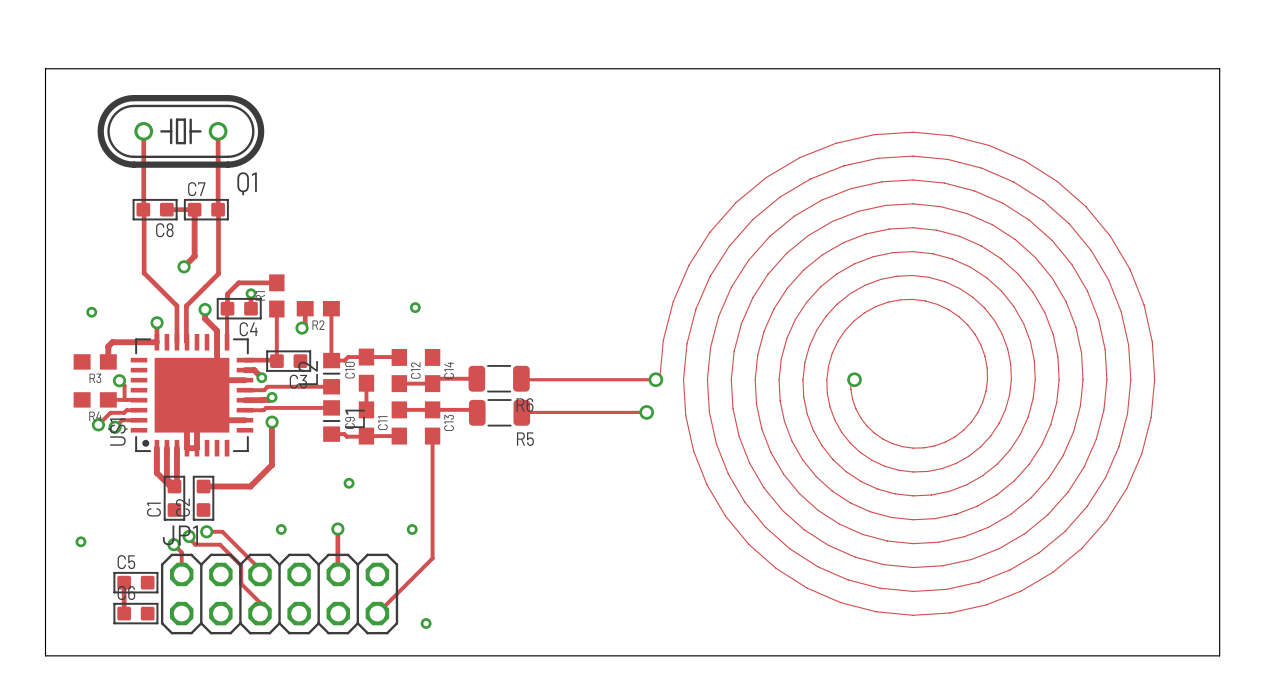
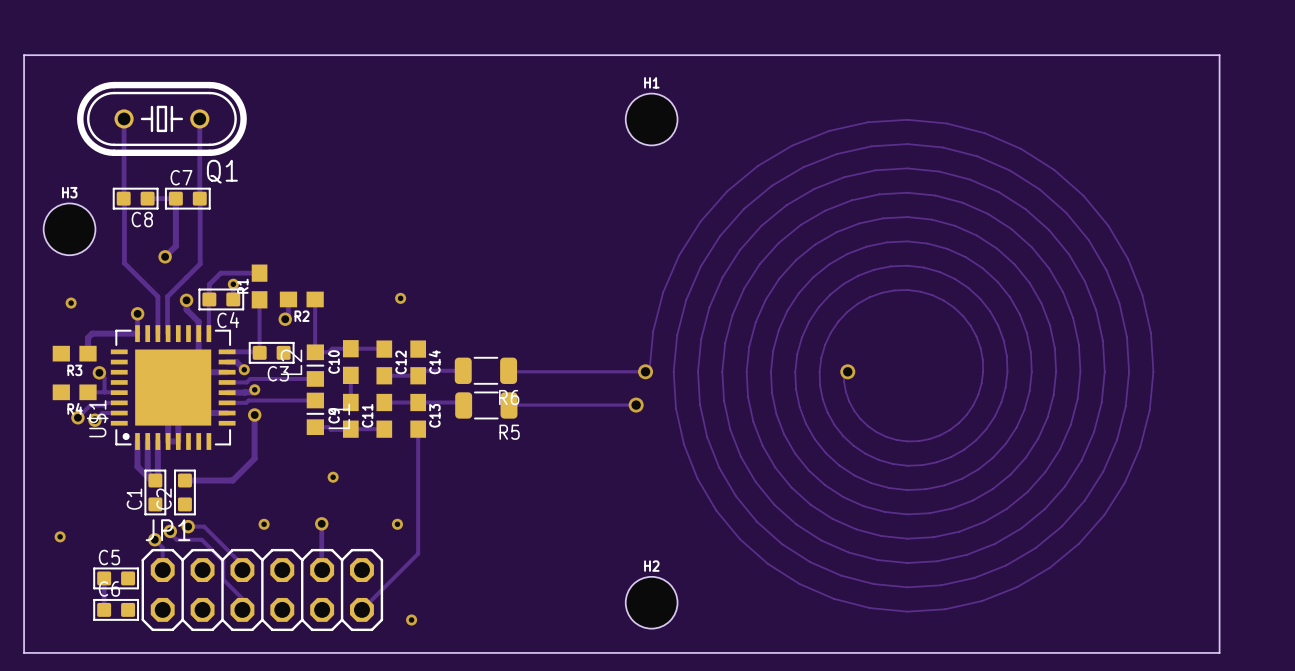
H1: none -> (651, 119)
H3: none -> (69, 229)
H2: none -> (651, 602)

